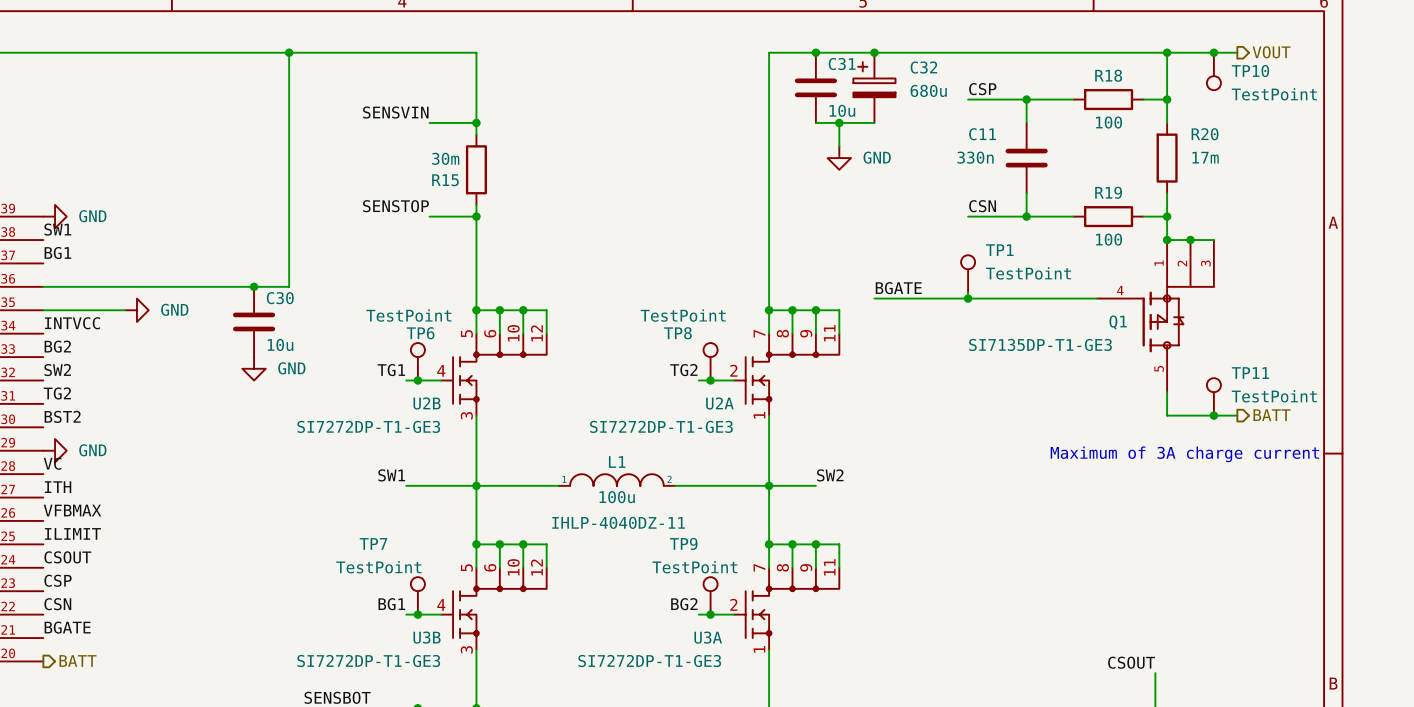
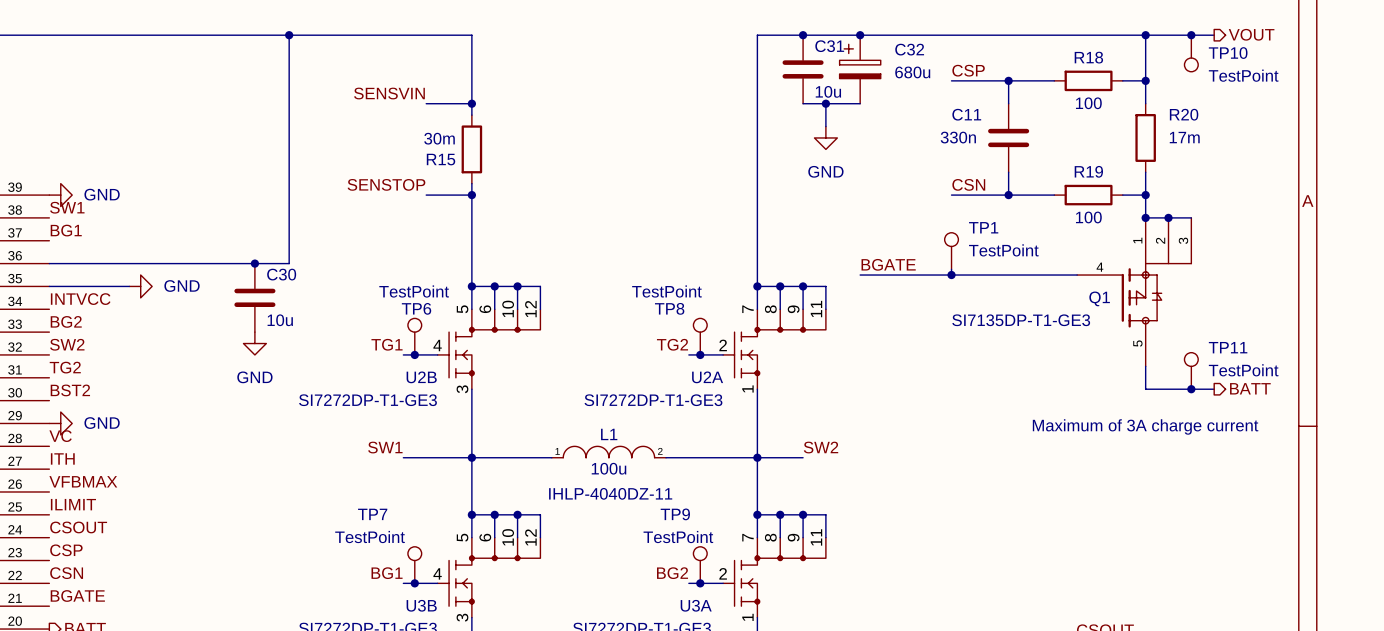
power symbol text position: GND (877, 157) -> GND (825, 171)
power symbol text position: GND (291, 368) -> GND (254, 377)

